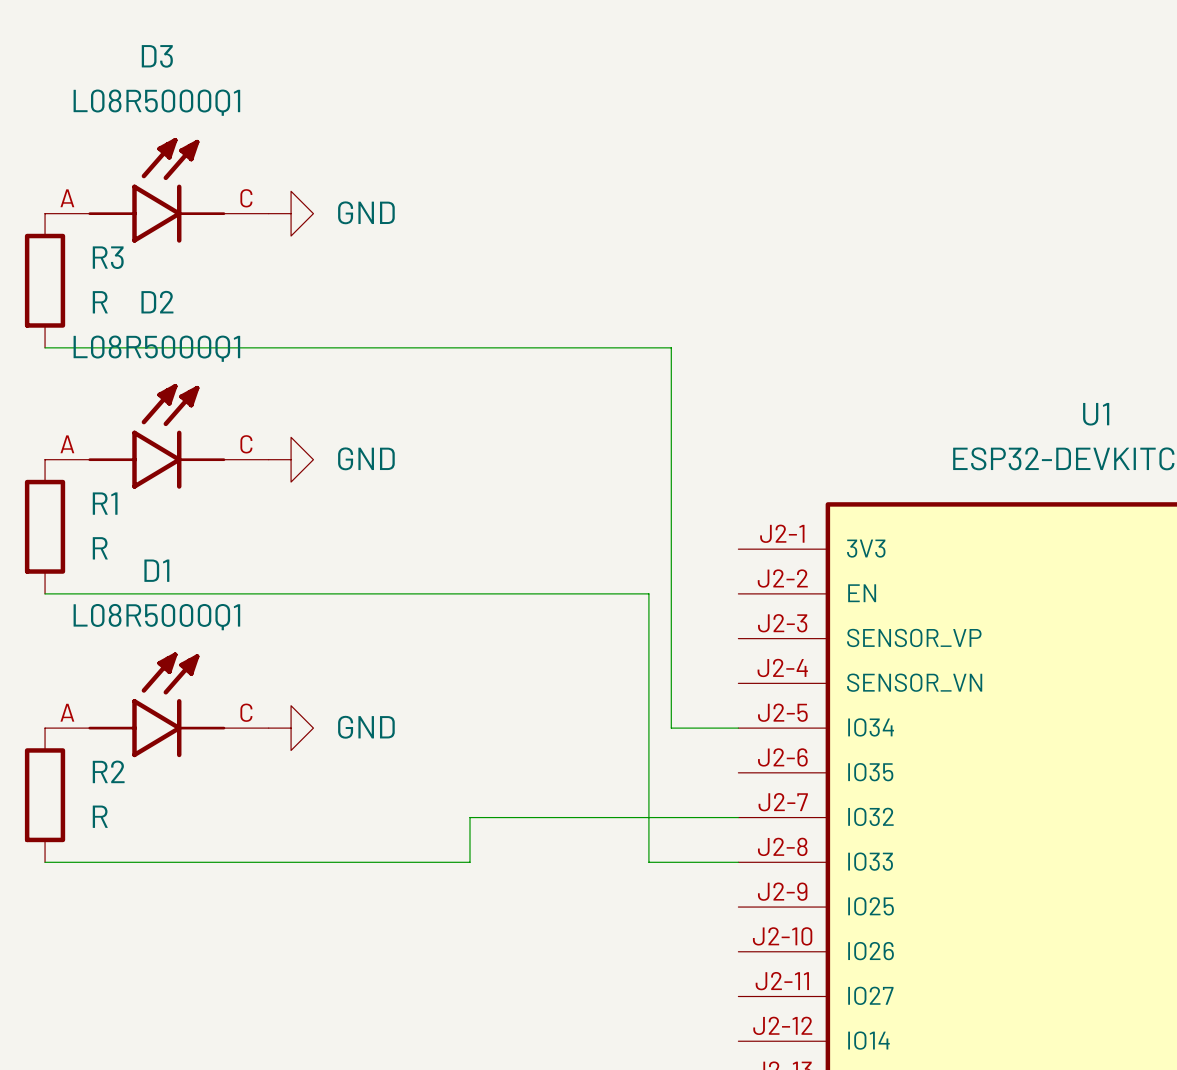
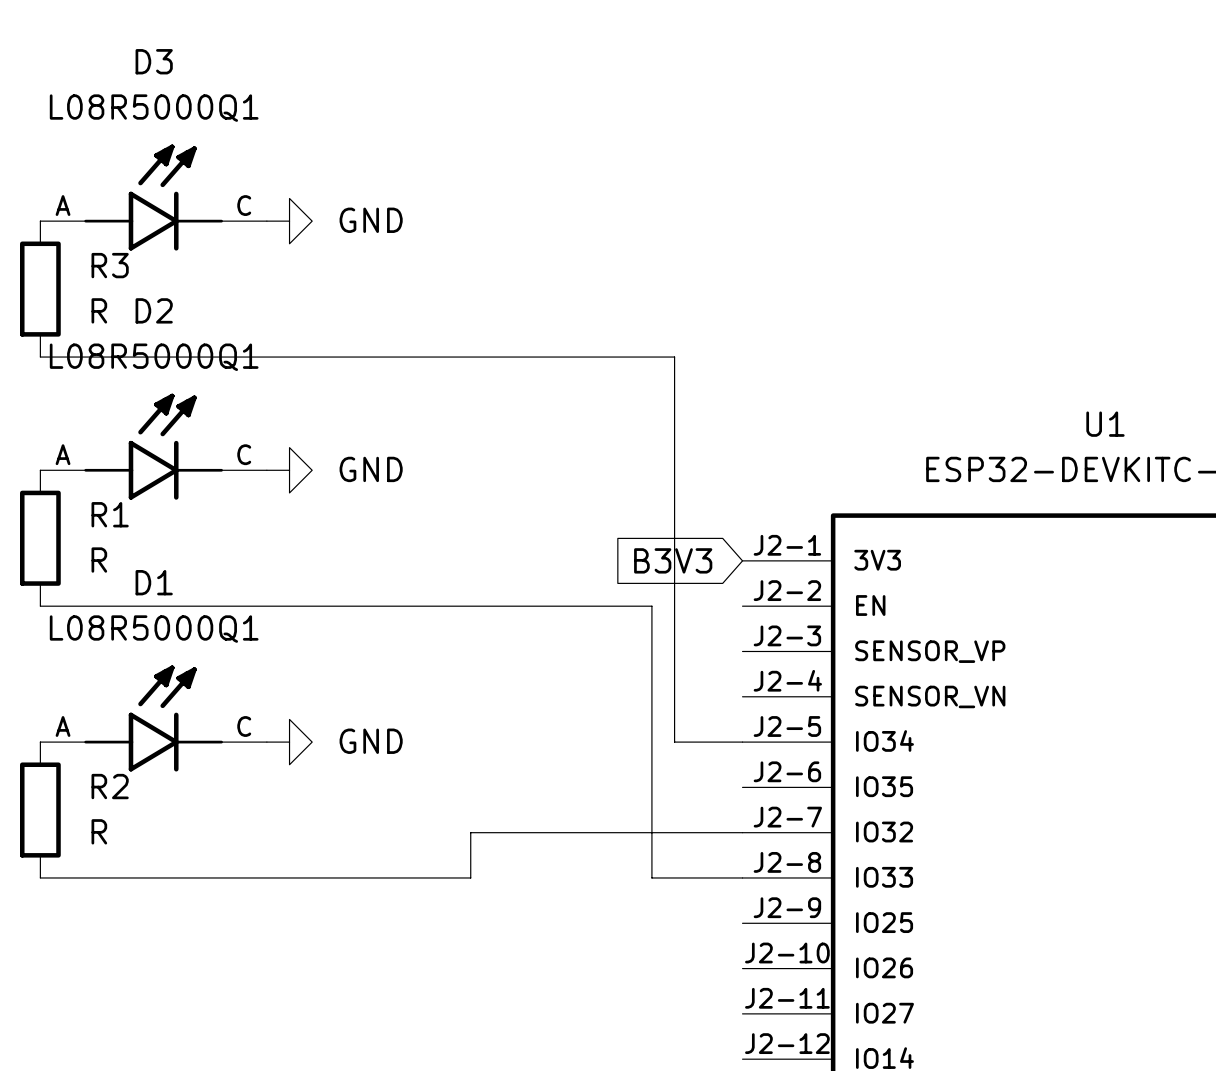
global label: none -> B3V3 (673, 560)

